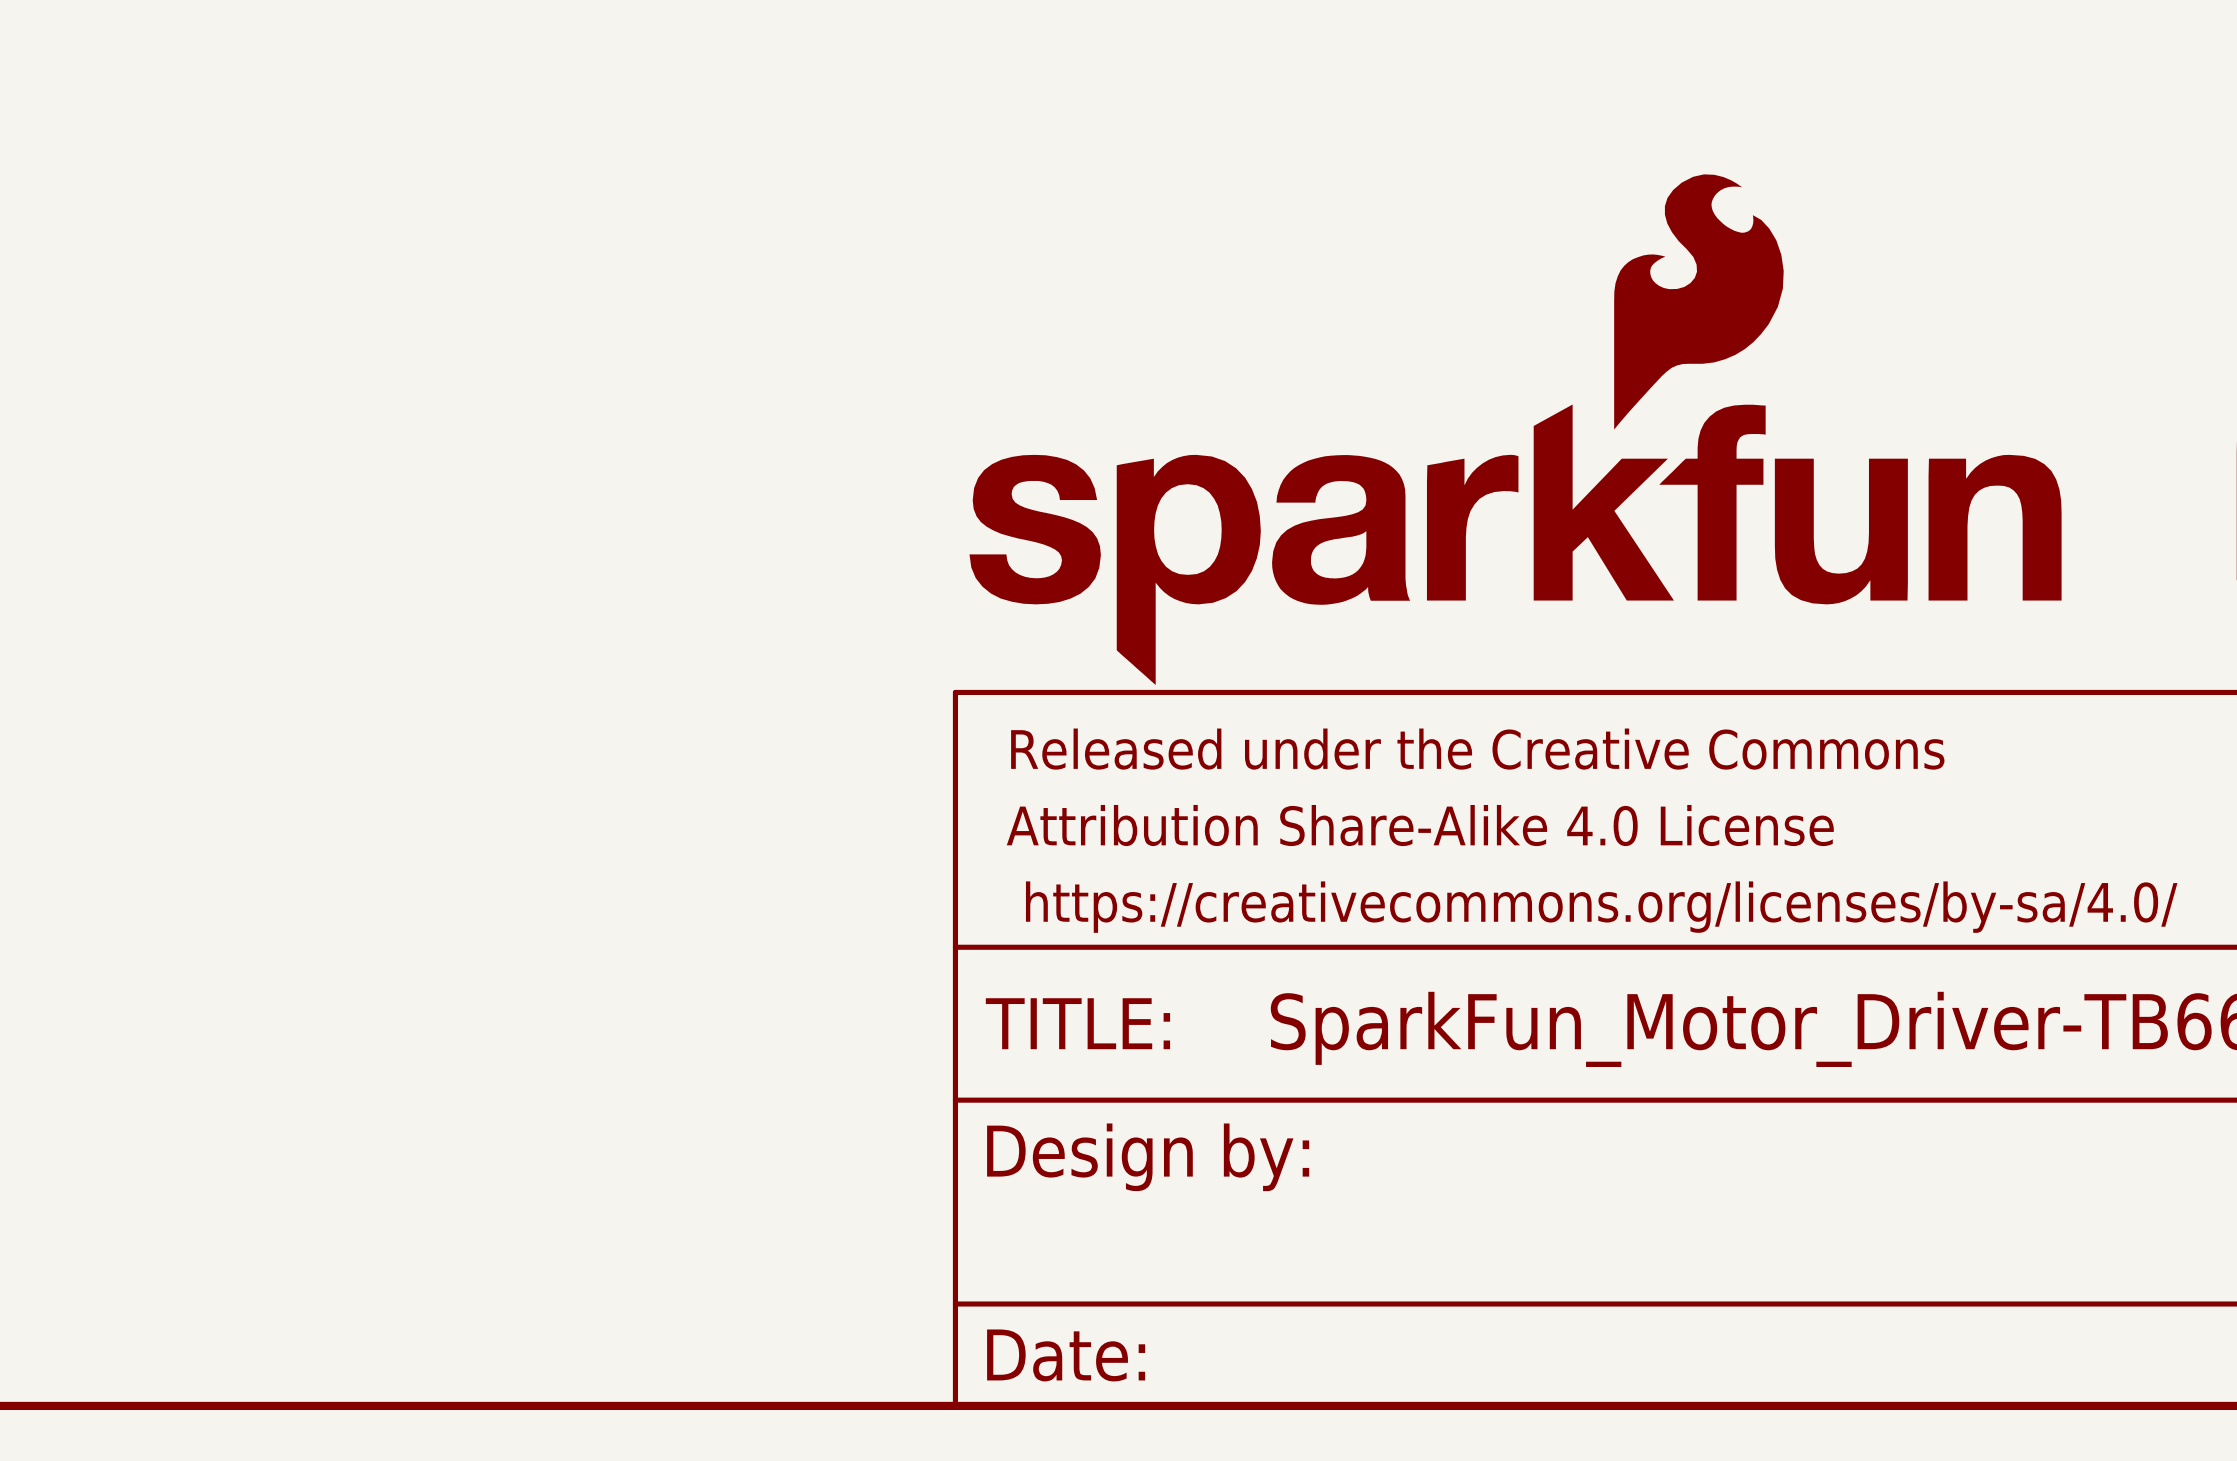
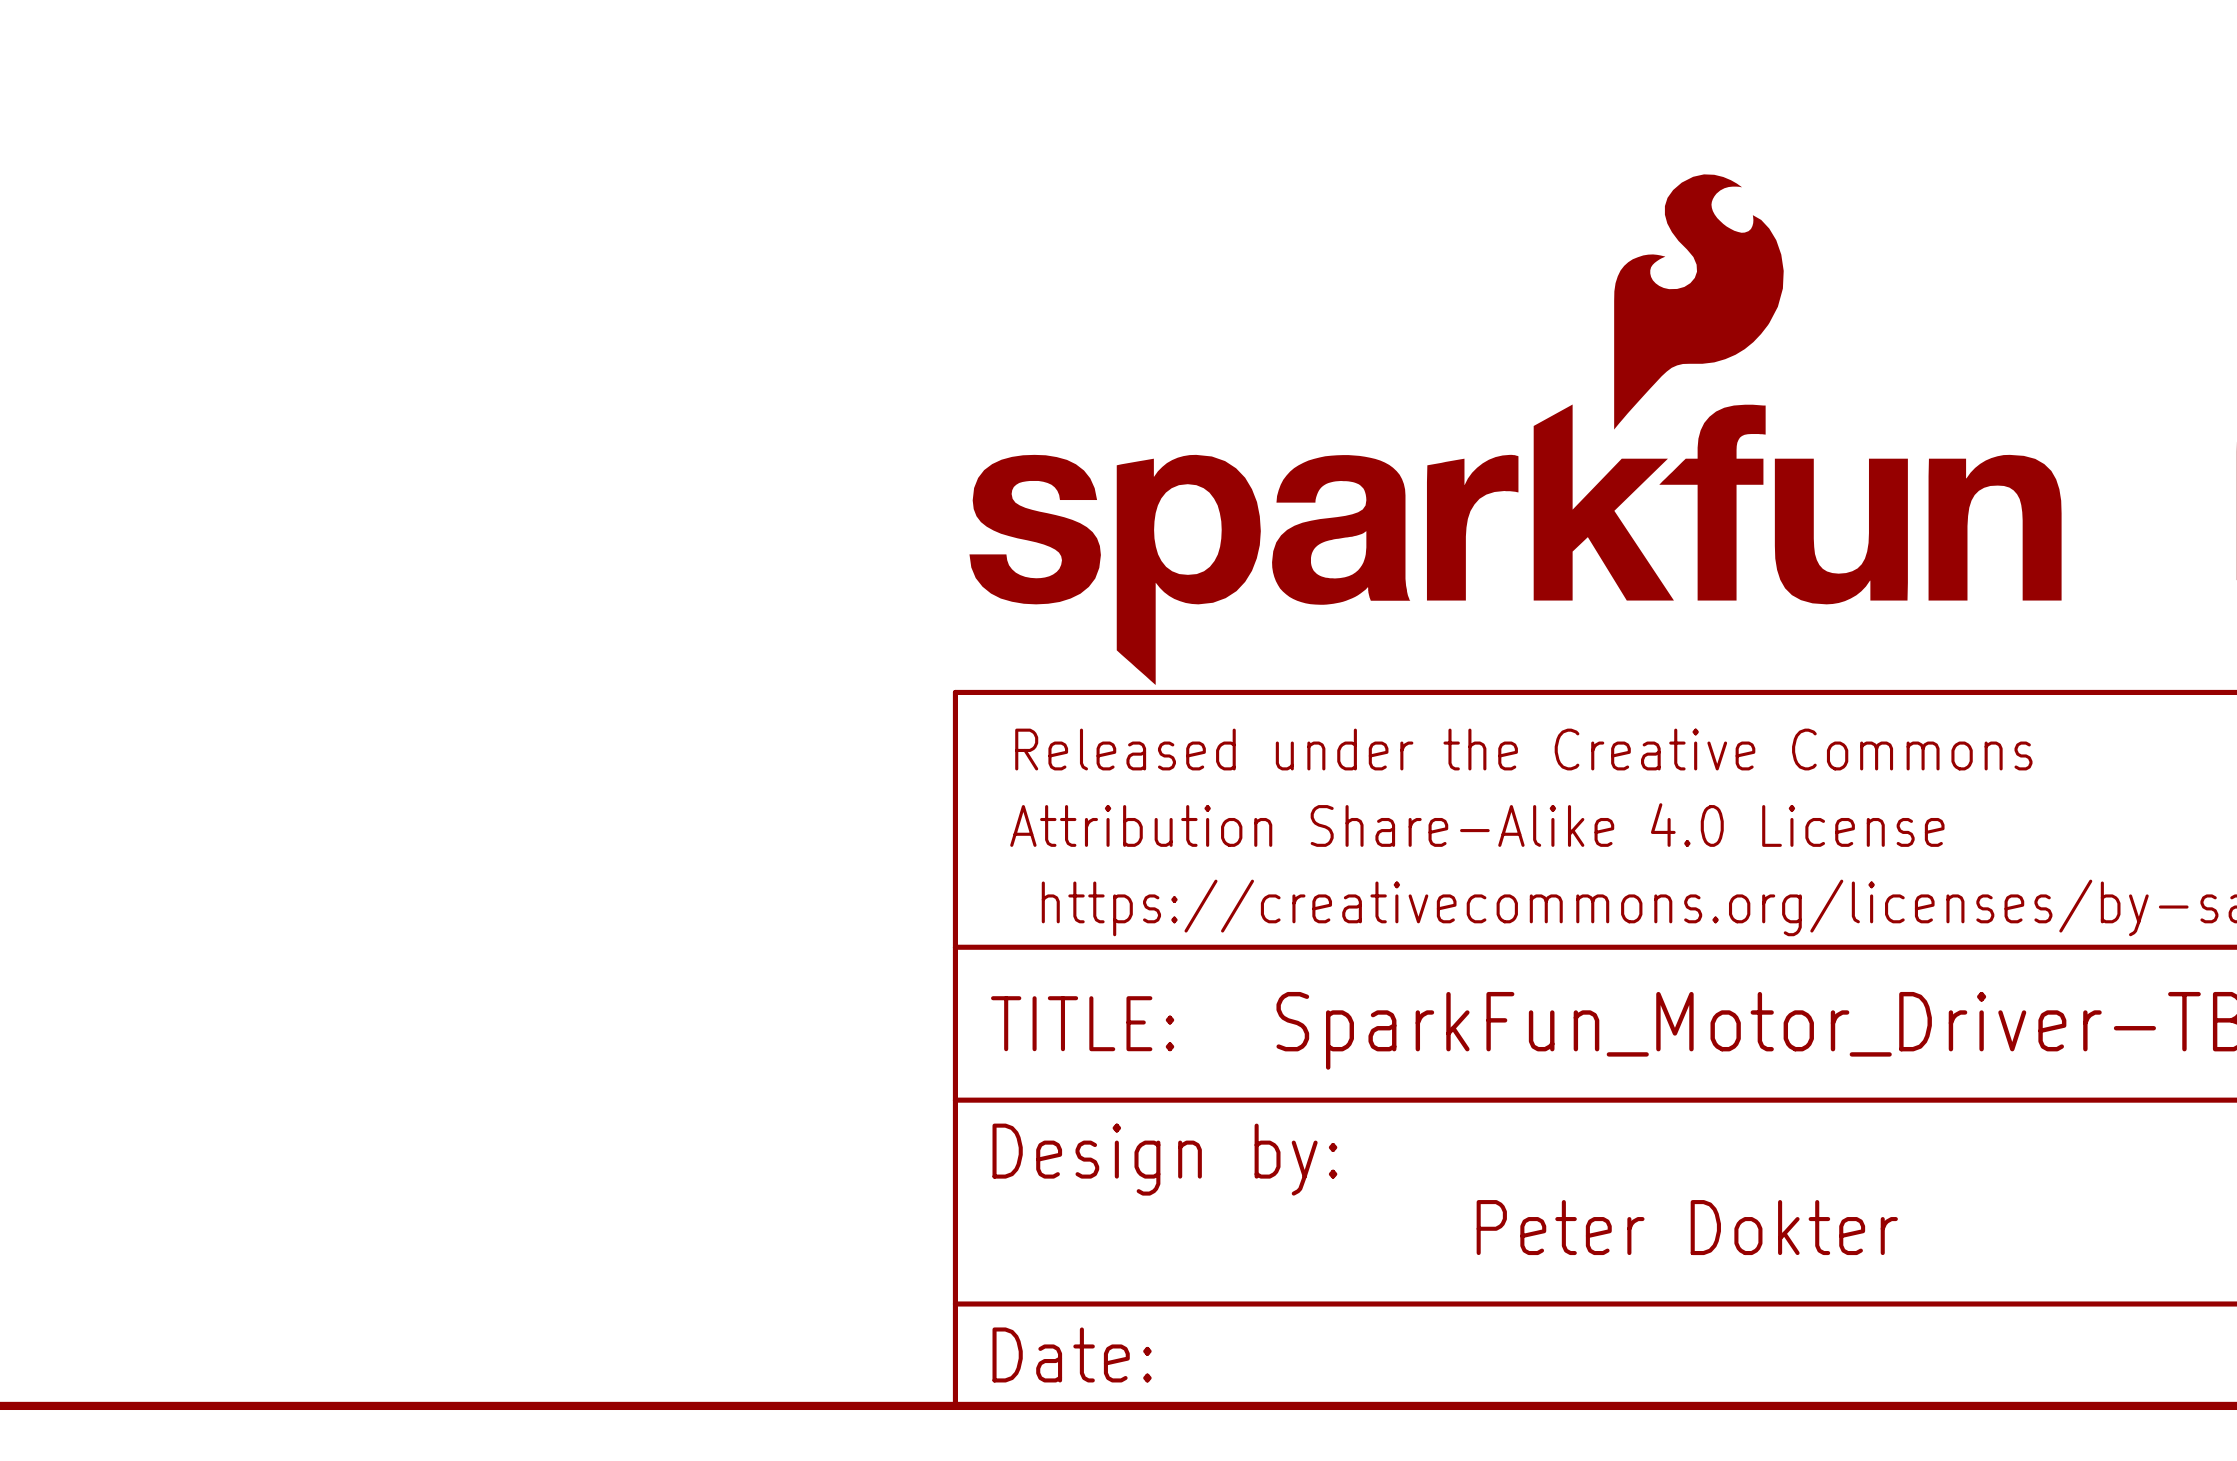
text: none -> Peter Dokter (1687, 1227)

